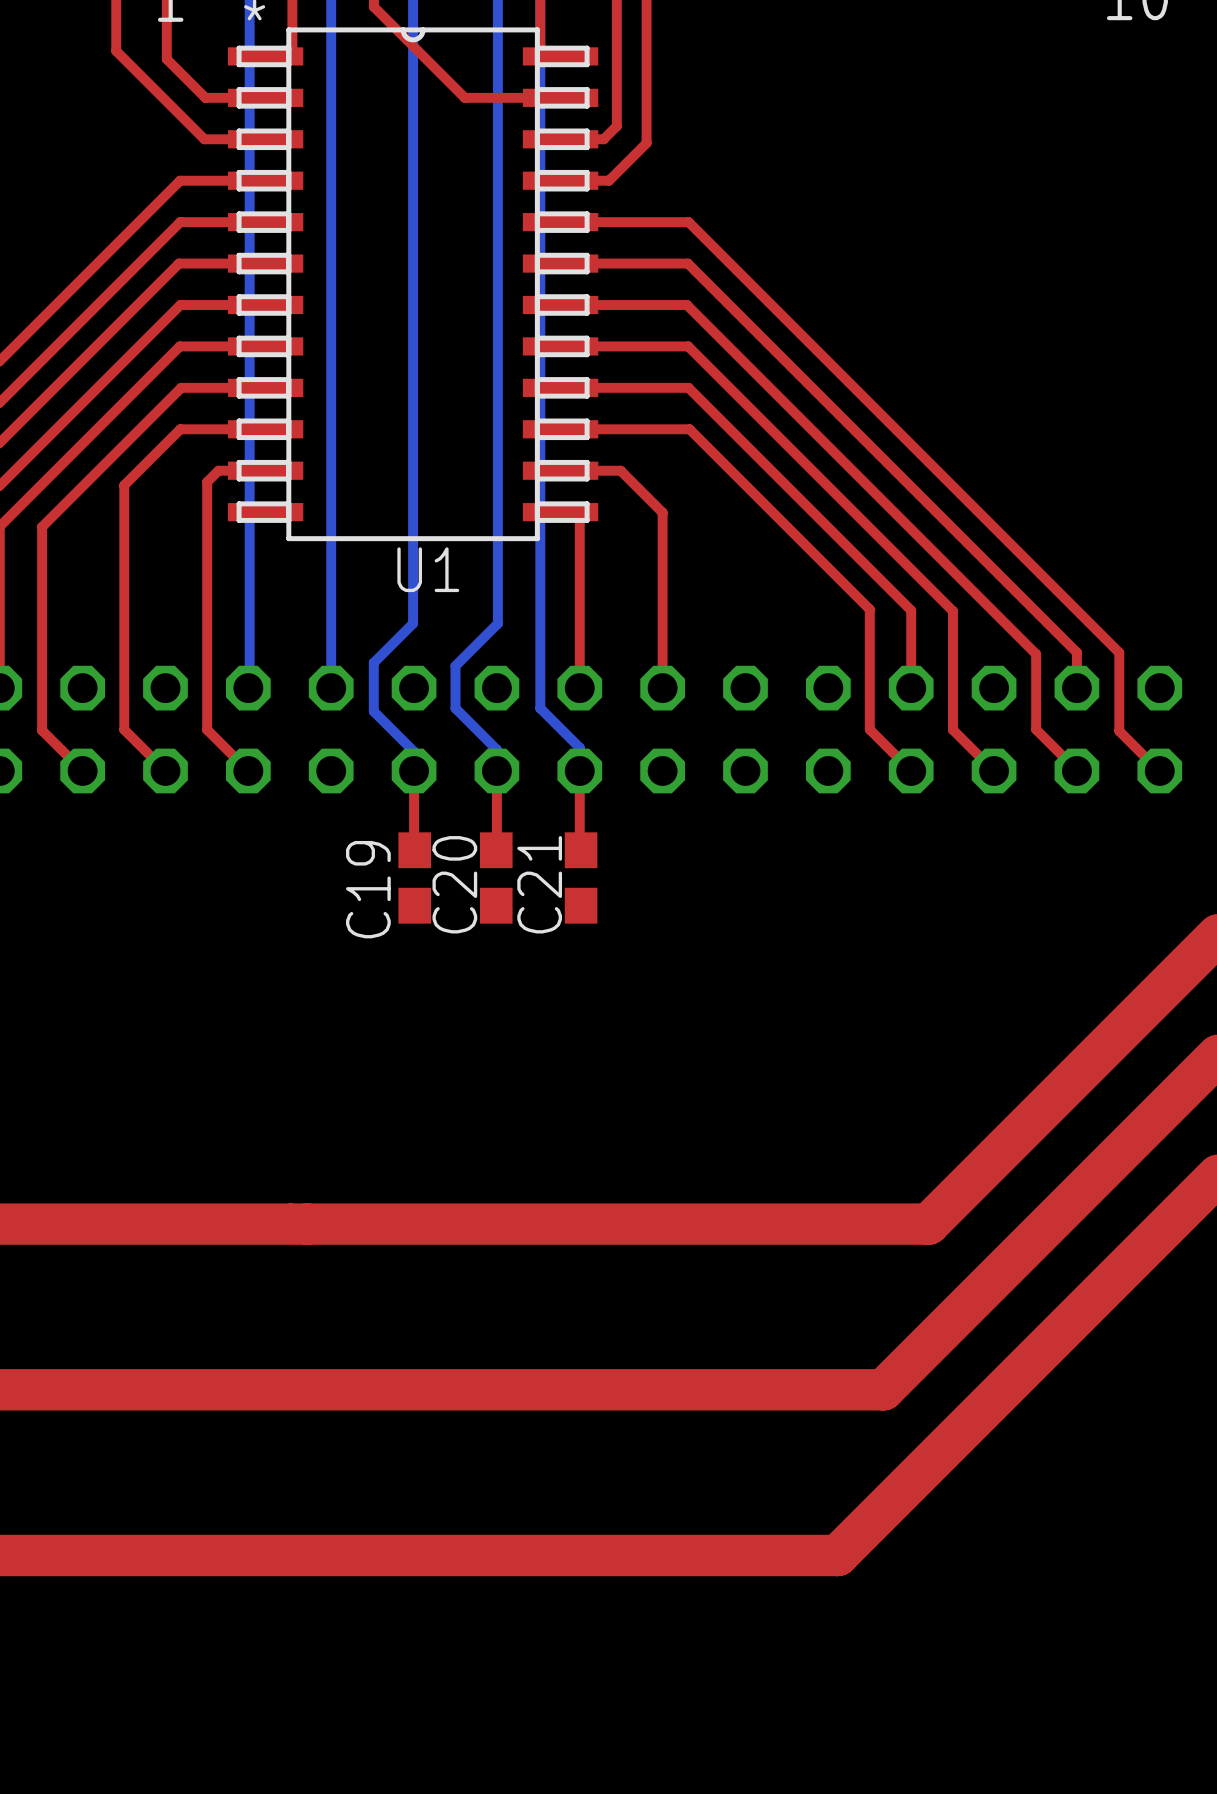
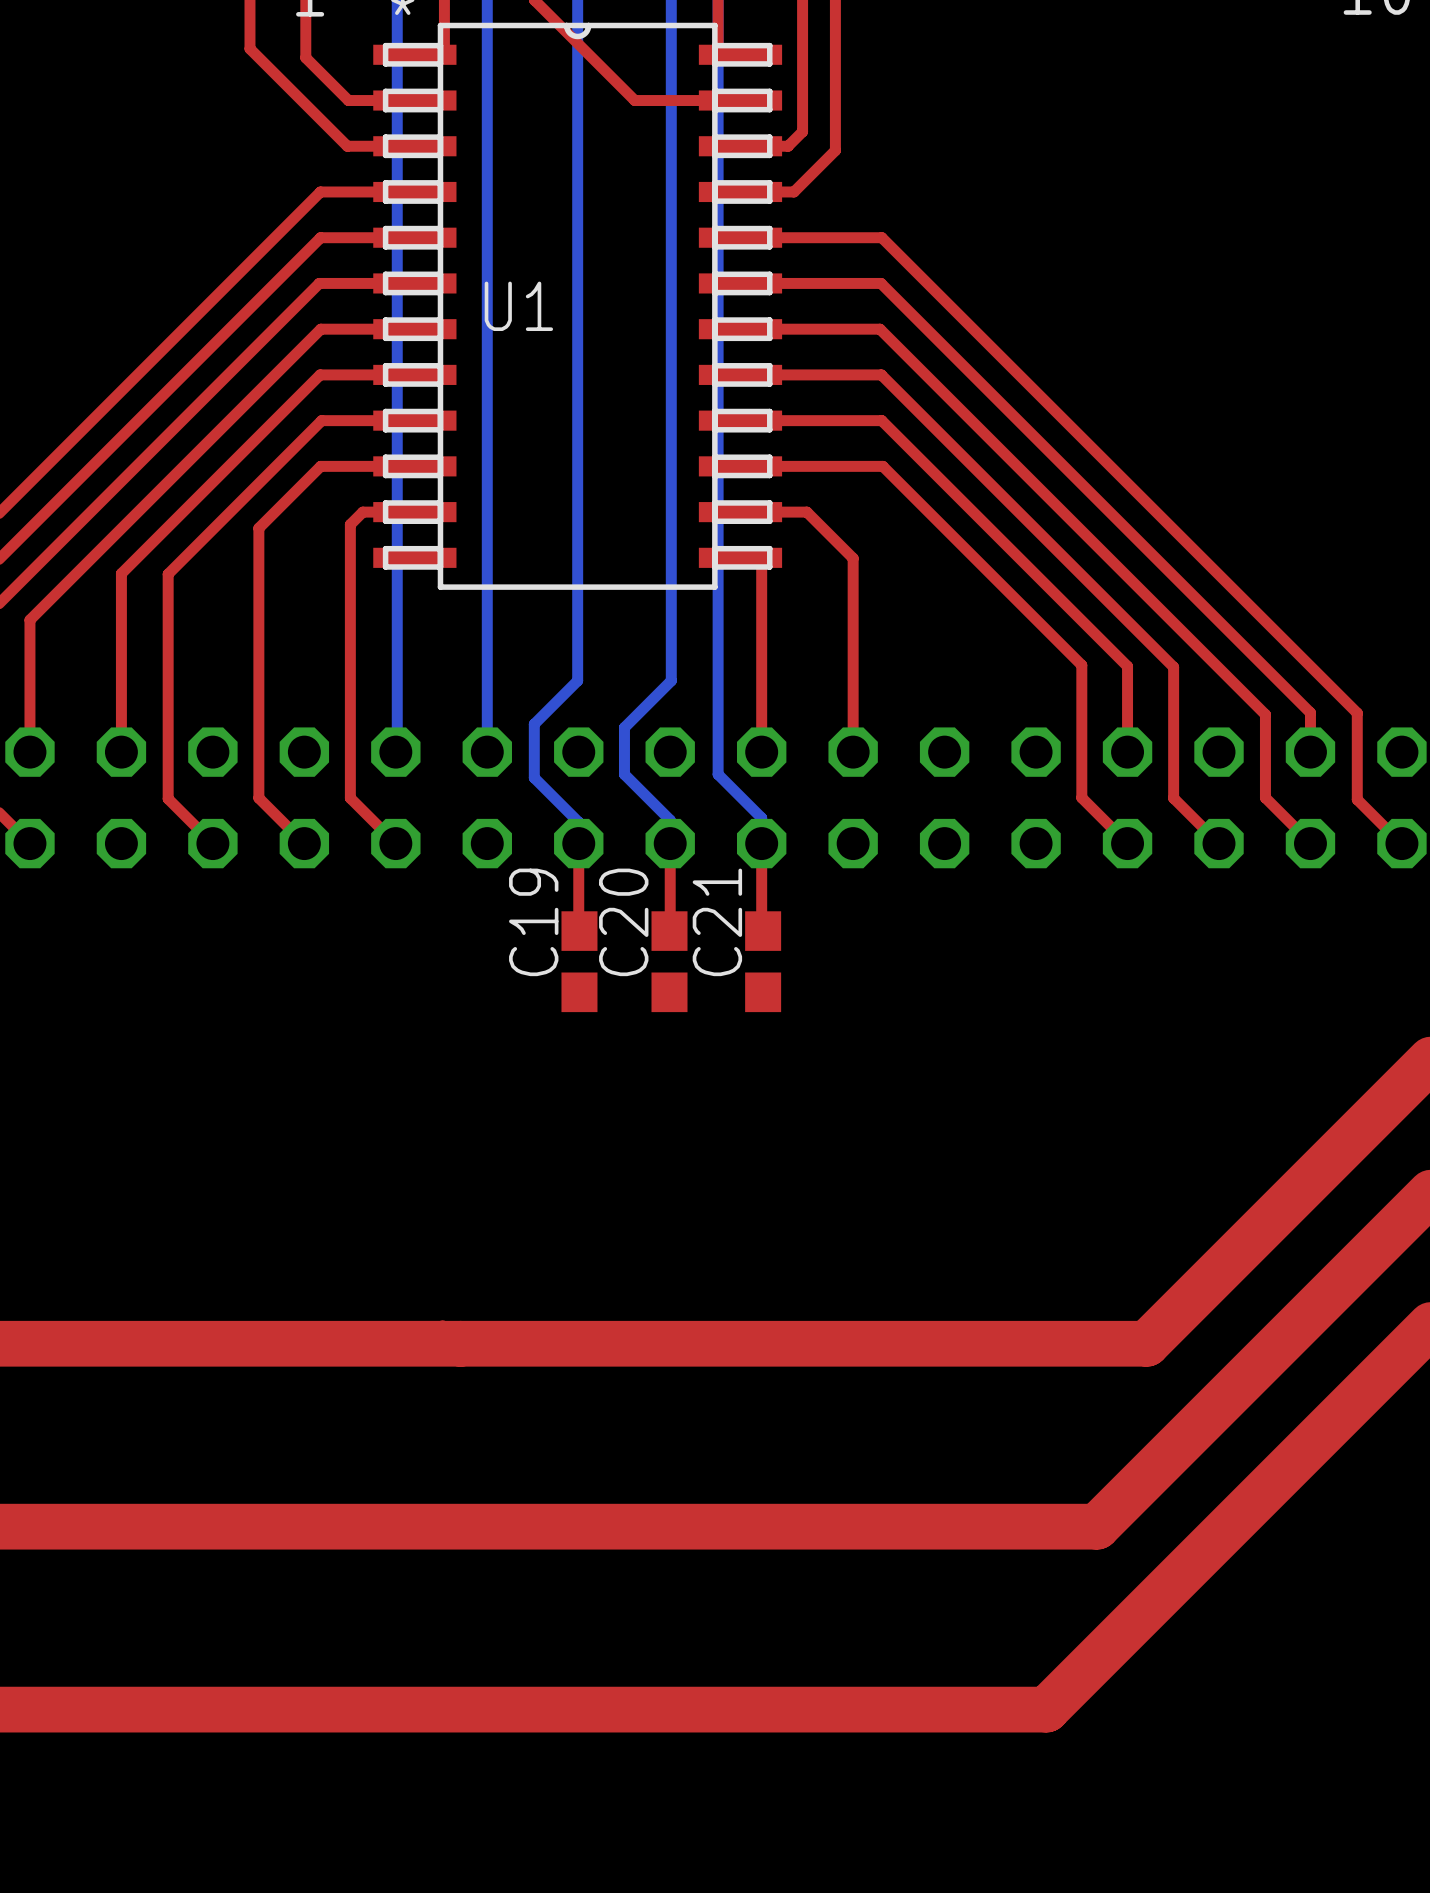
U1 name position: U1 (428, 569) -> U1 (518, 306)
C20 name position: C20 (454, 884) -> C20 (623, 922)
C21 name position: C21 (539, 884) -> C21 (717, 922)
C19 name position: C19 (368, 889) -> C19 (533, 922)

